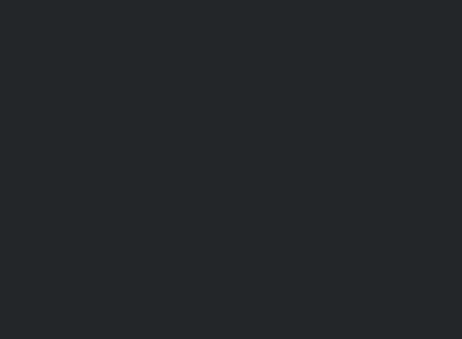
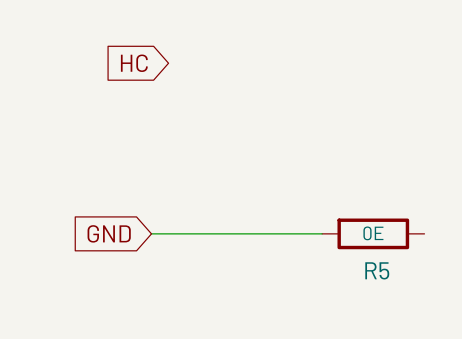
global label: none -> HC (134, 63)
global label: none -> GND (109, 233)
wire: none -> (151, 233) (322, 233)
R5: none -> 0E (373, 233)

